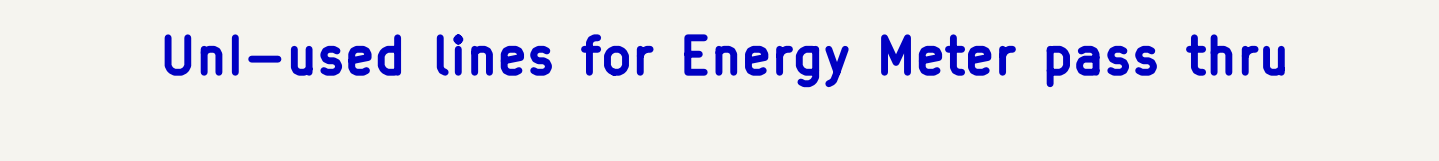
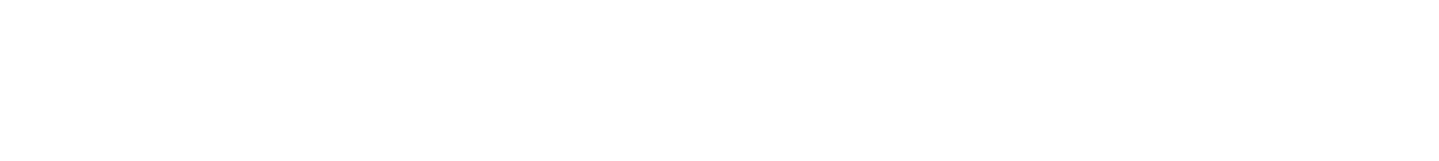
text: UnI-used lines for Energy Meter pass thru (724, 60) -> none

